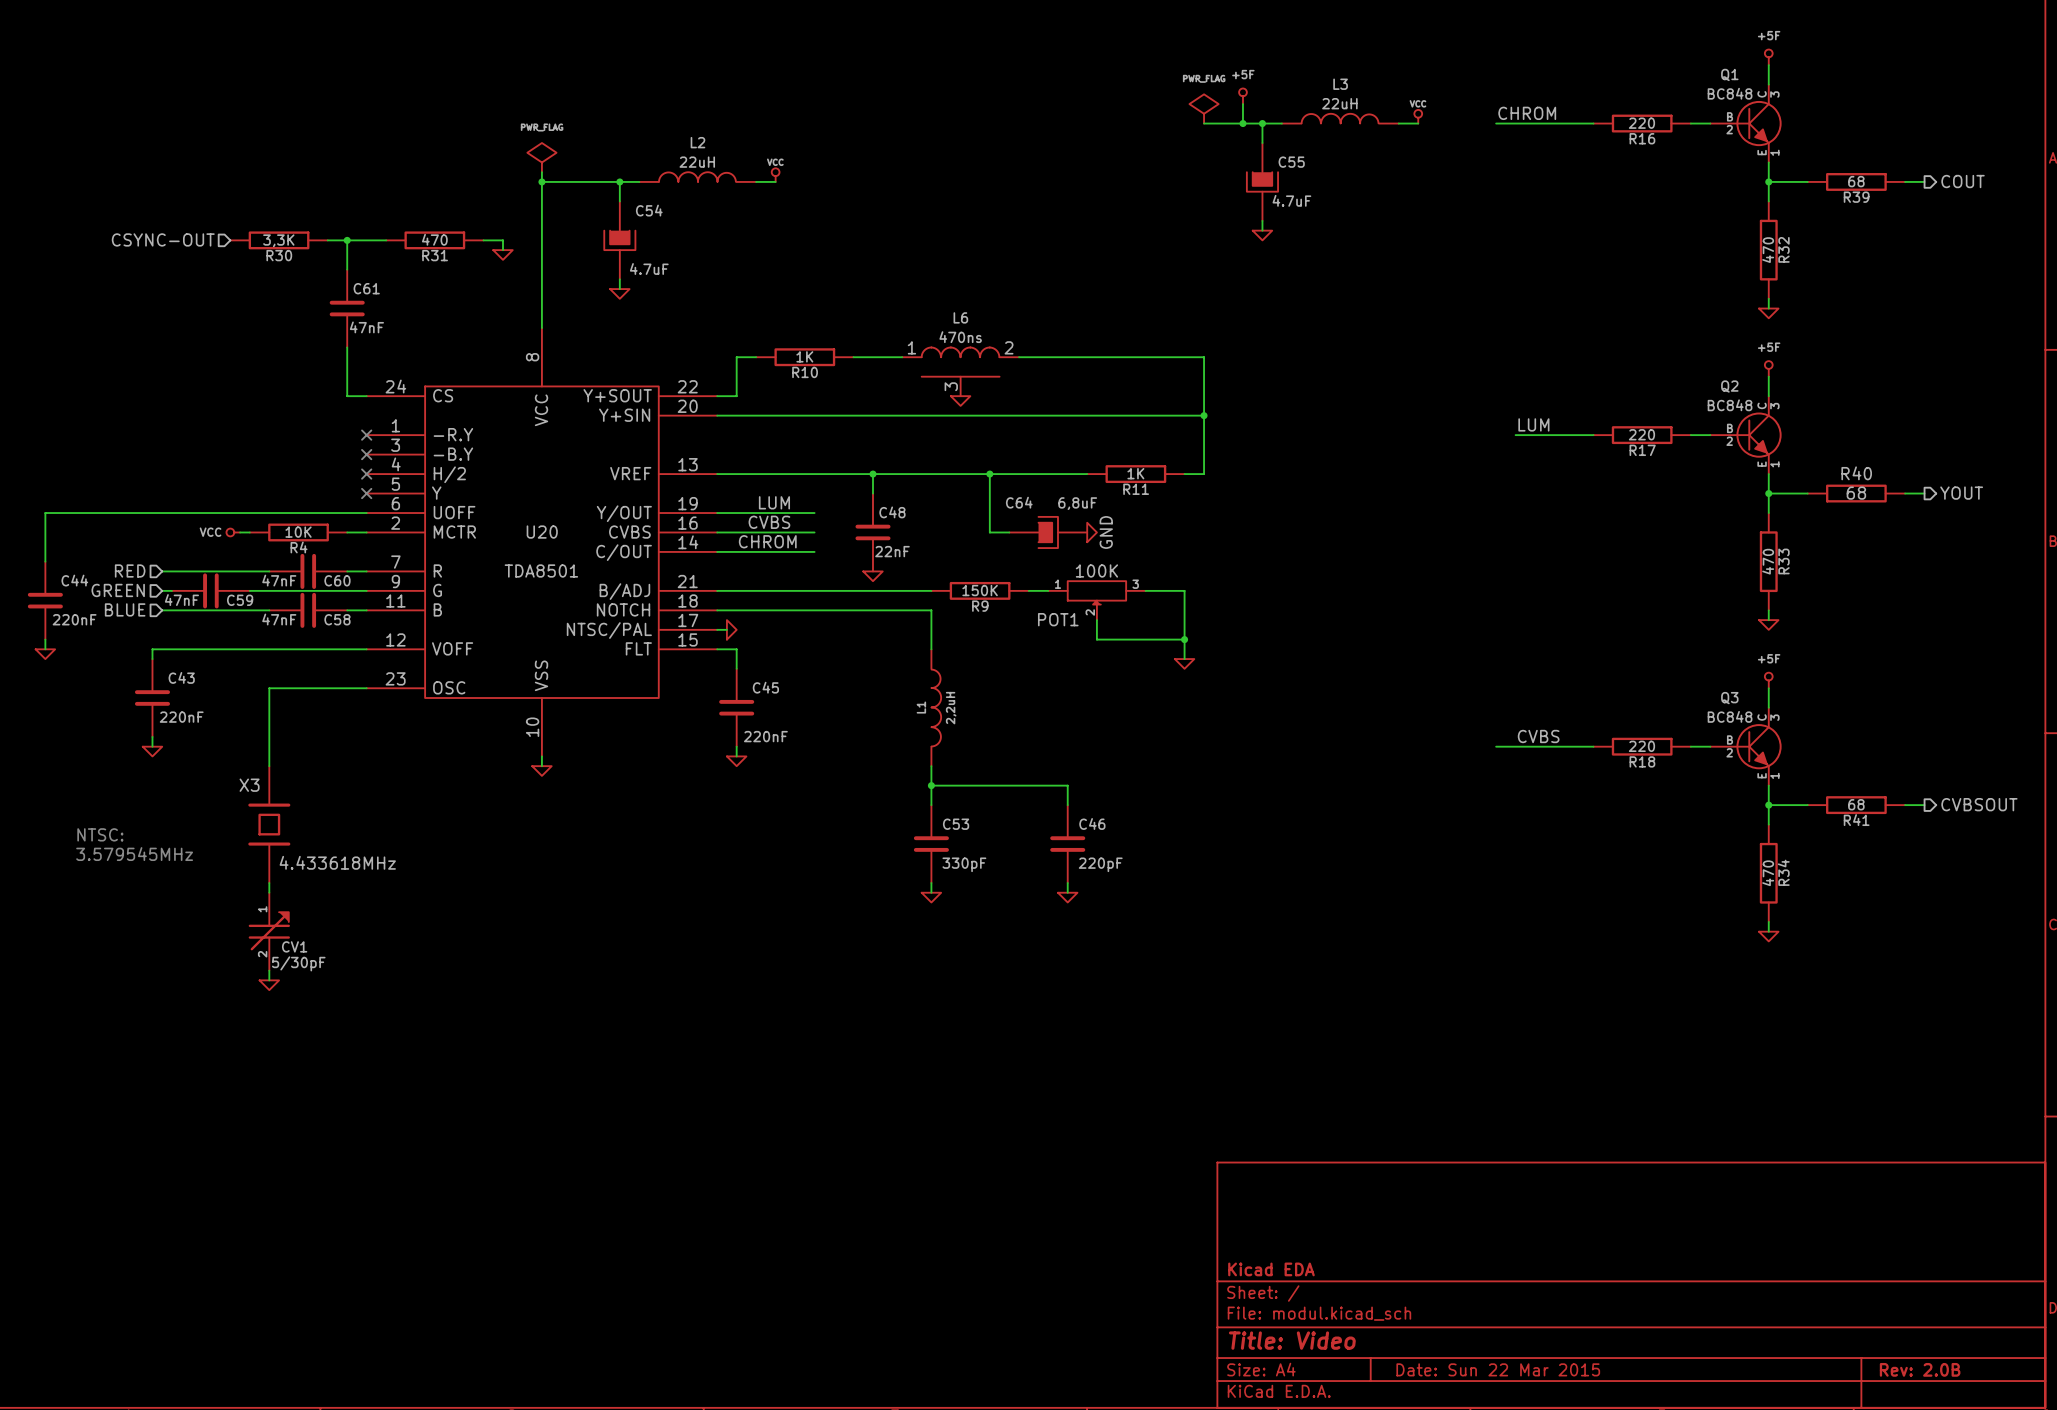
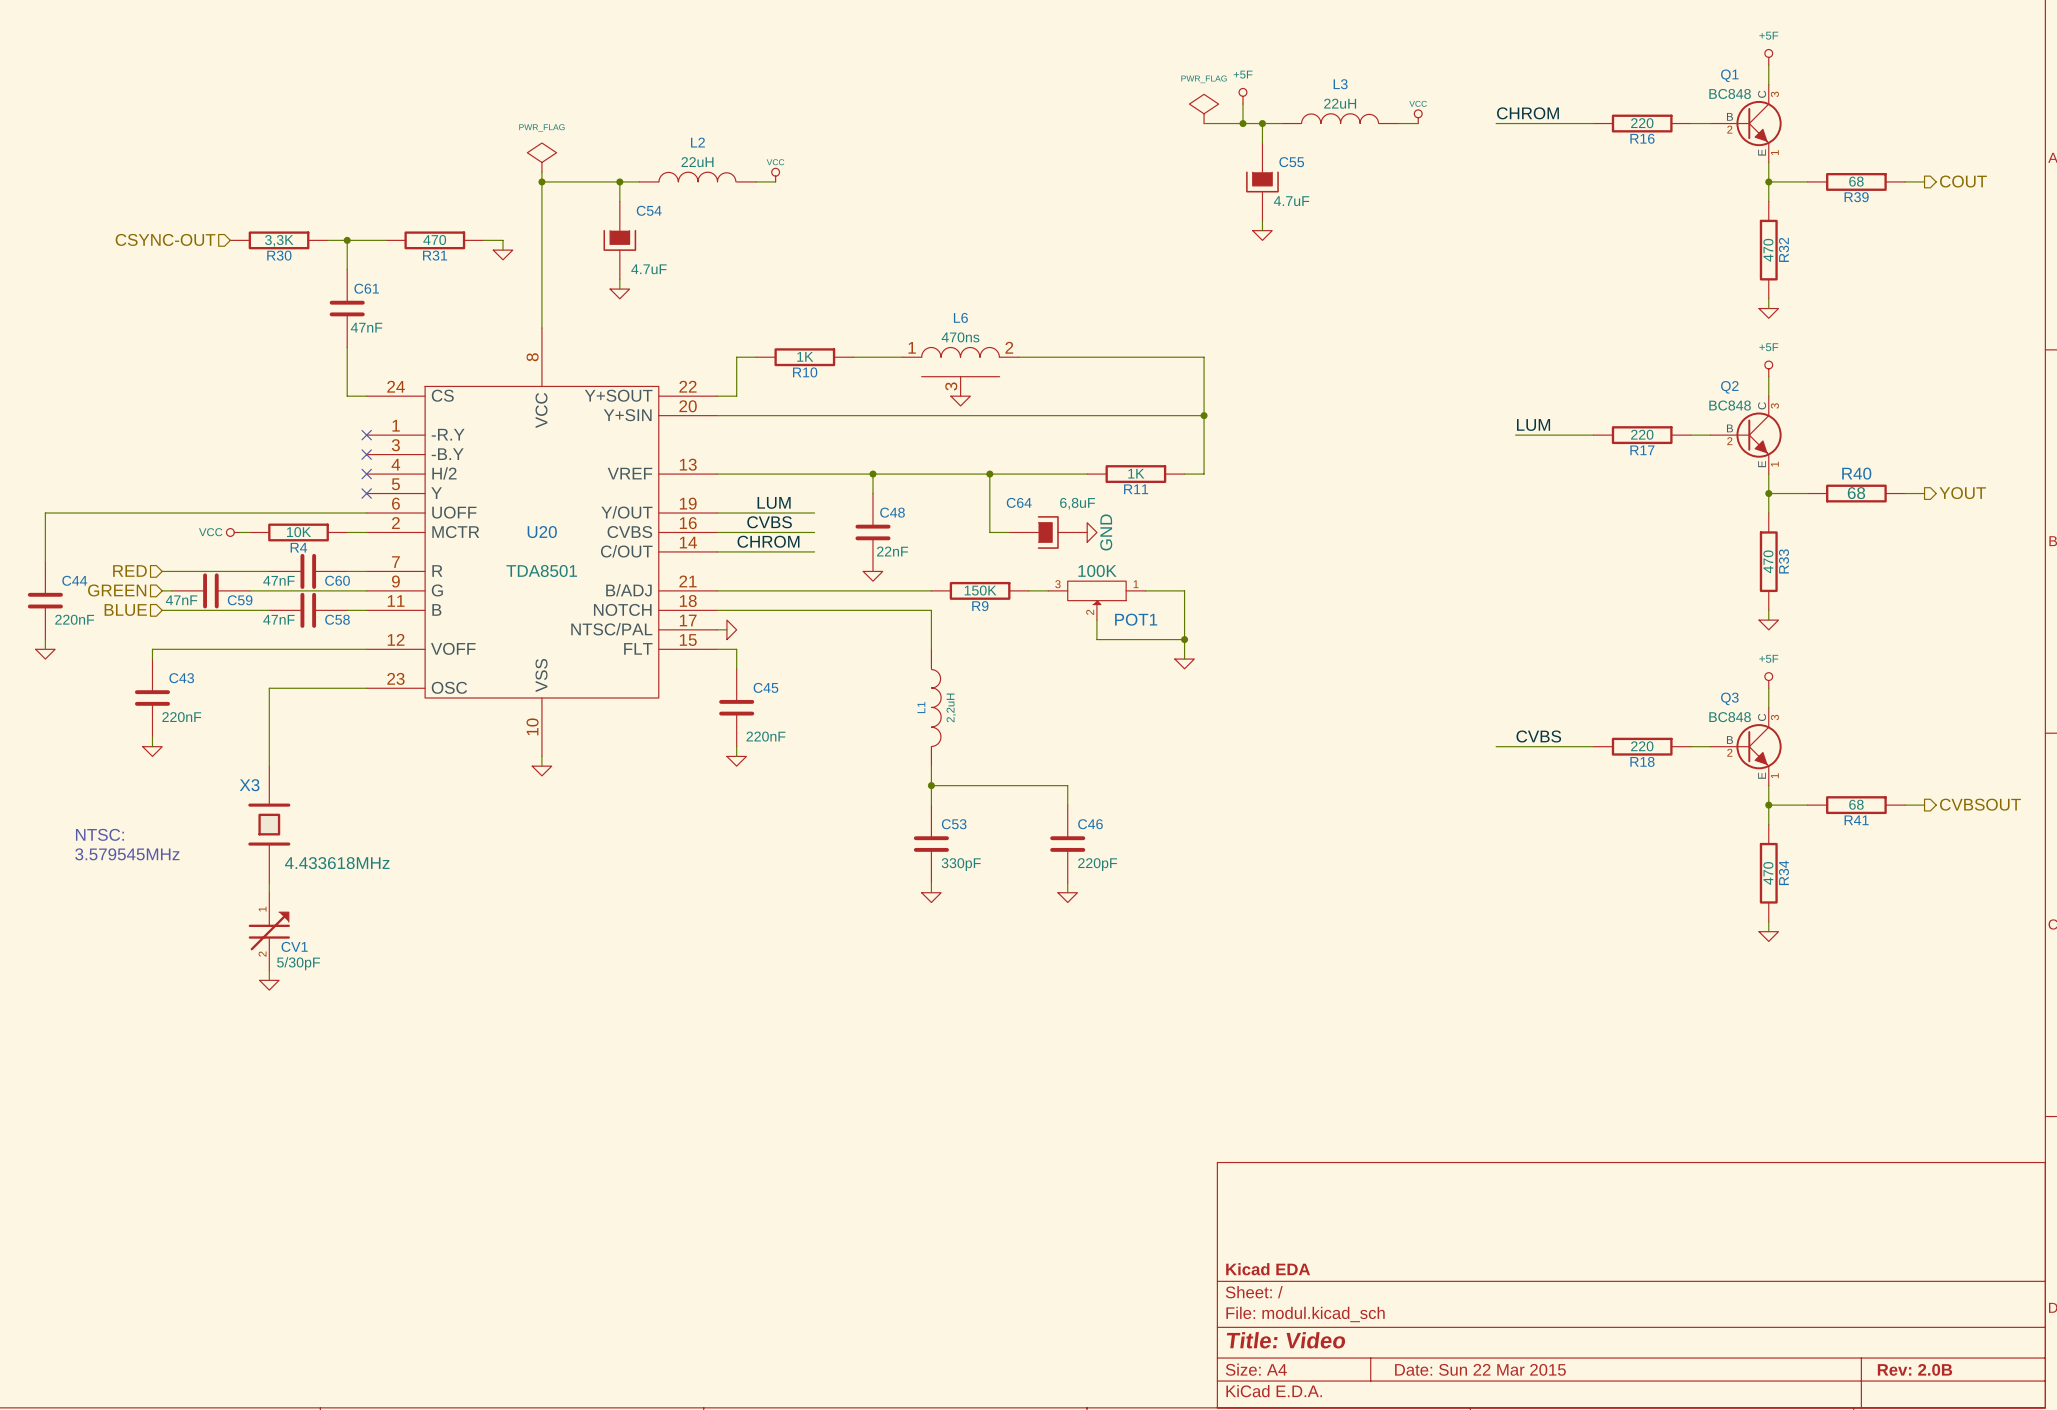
POT1 flip: as is (1096, 592) -> left-right (1096, 592)

